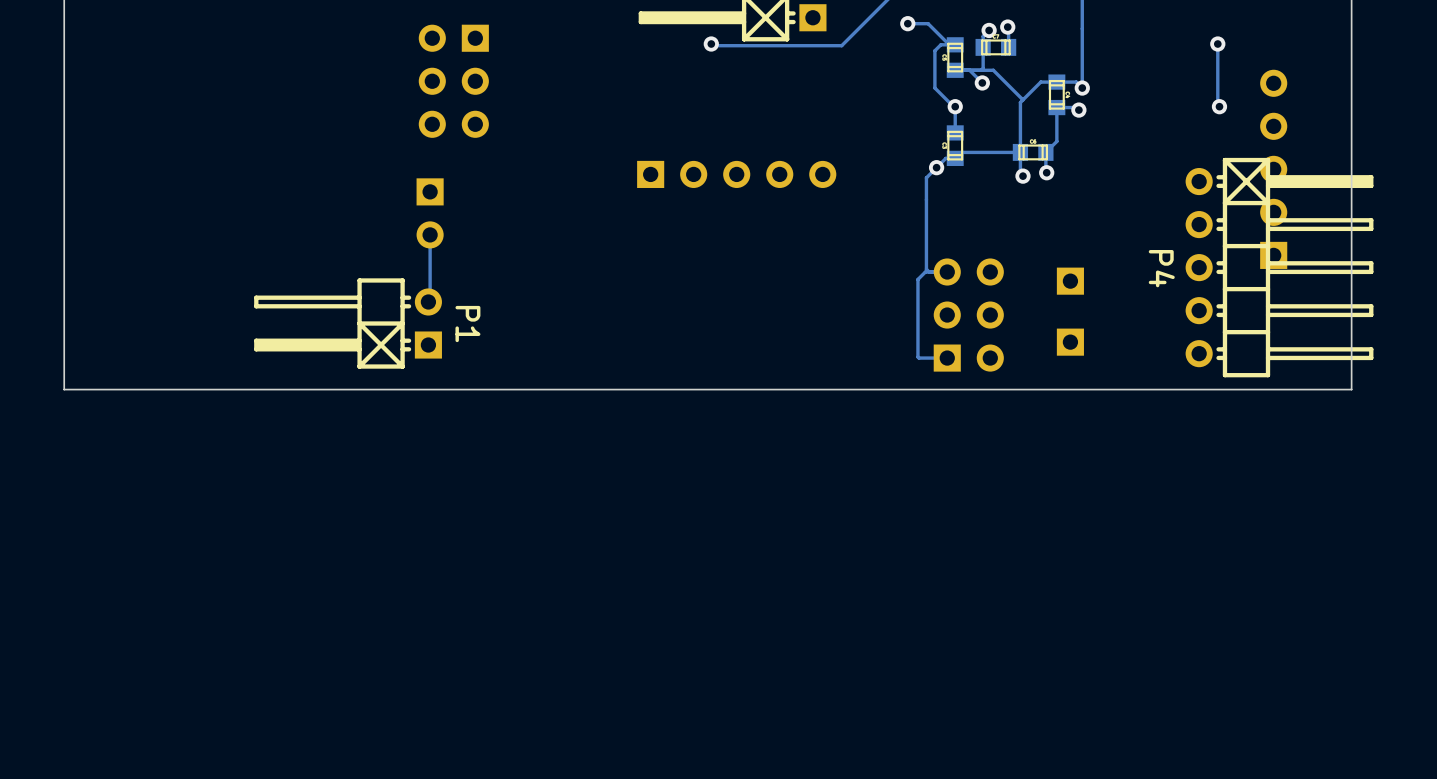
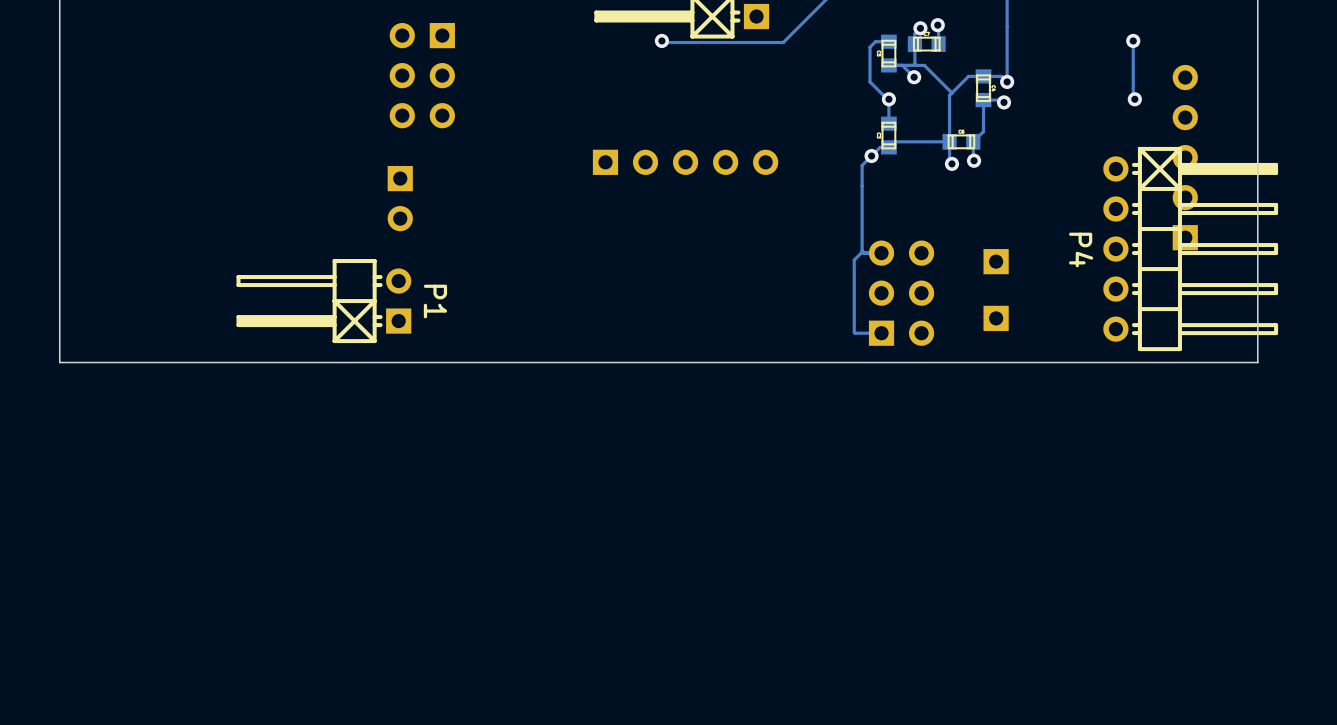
track: (907, 23) (928, 23) (949, 44) -> none
via: (907, 23) -> none
track: (430, 234) (430, 300) (428, 301) -> none

